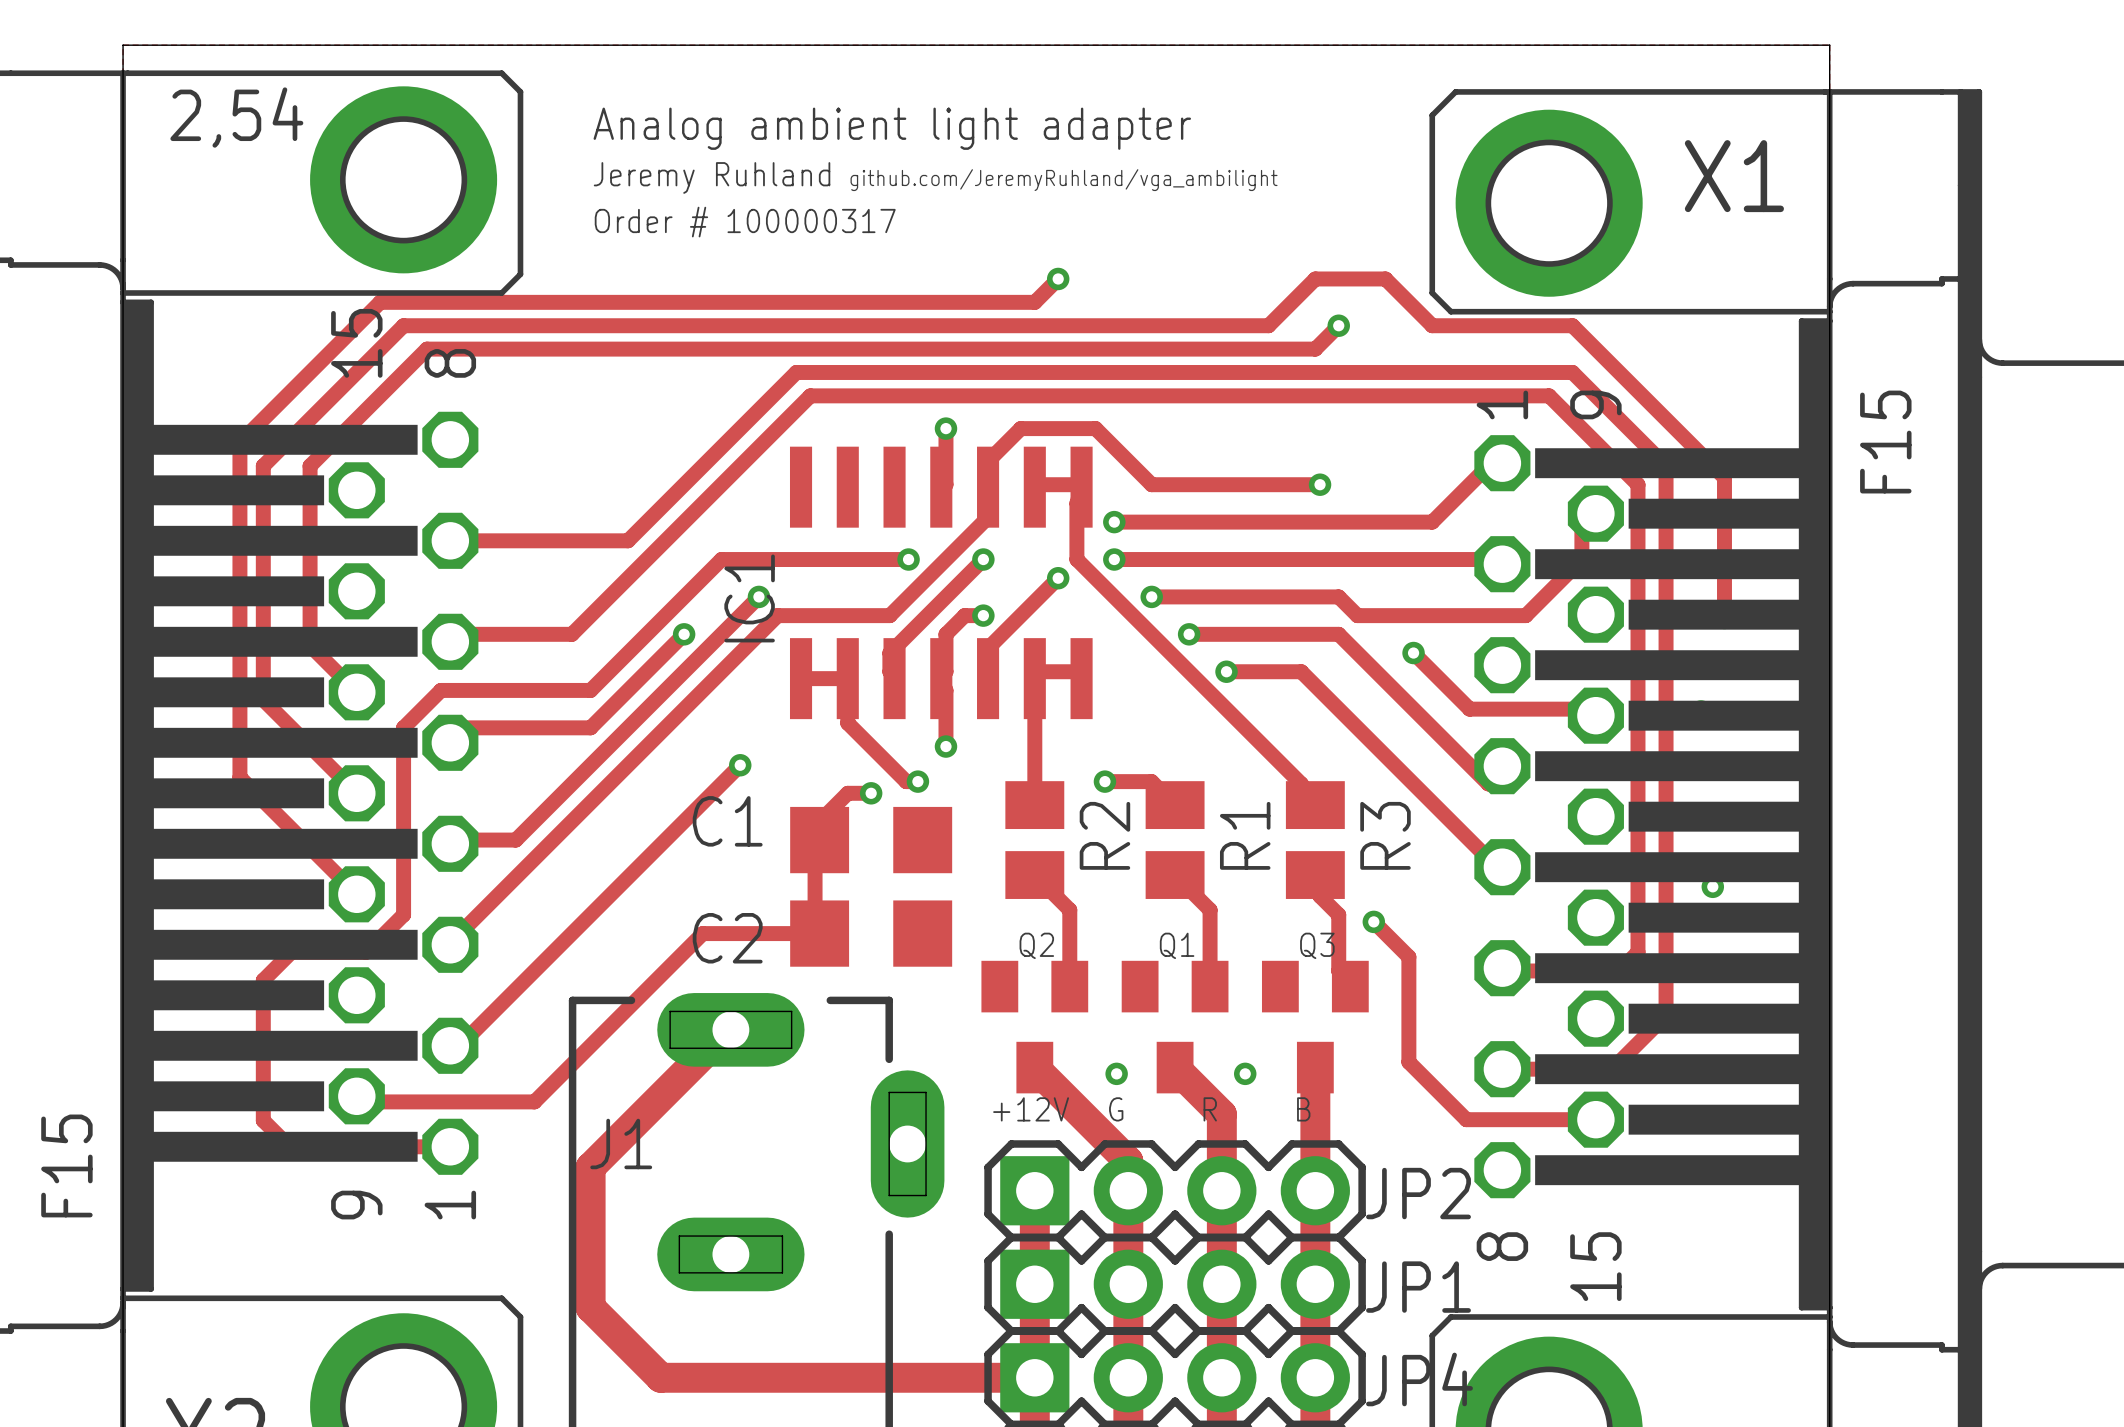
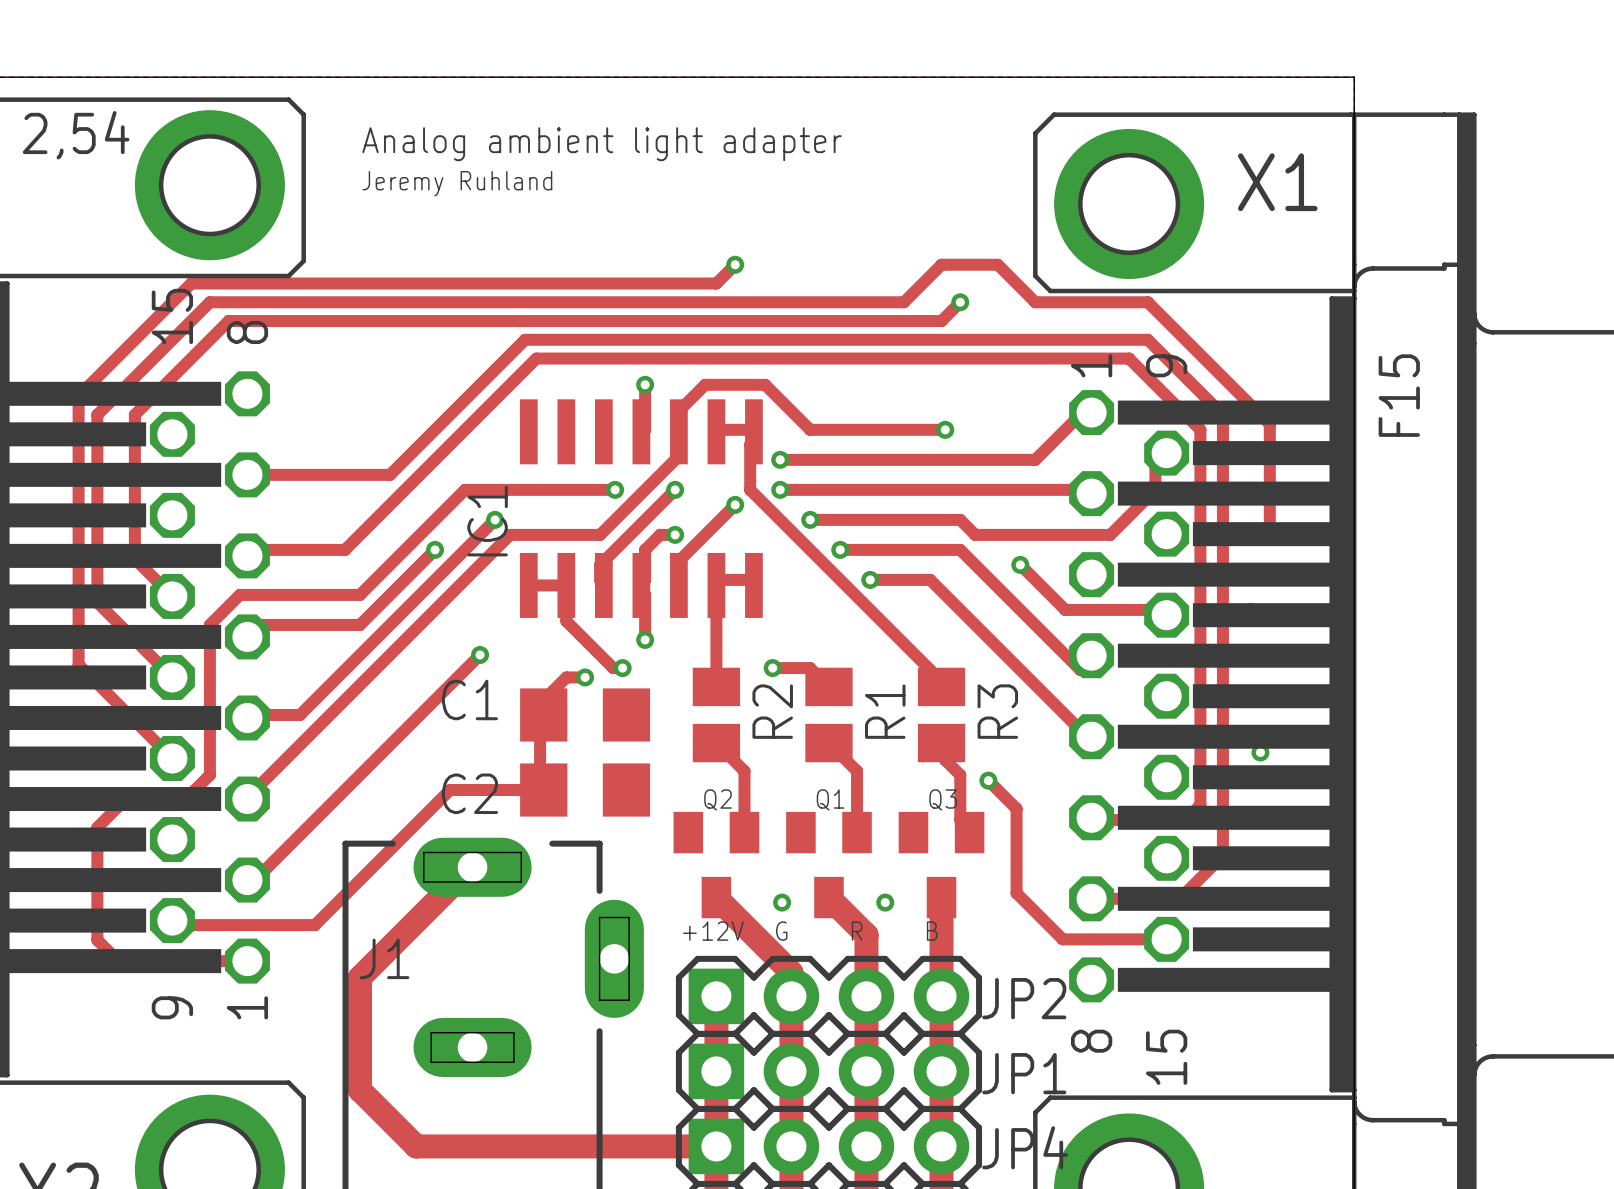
text: github.com/JeremyRuhland/vga_ambilight (1064, 180) -> none
text: Order # 100000317 (745, 222) -> none

